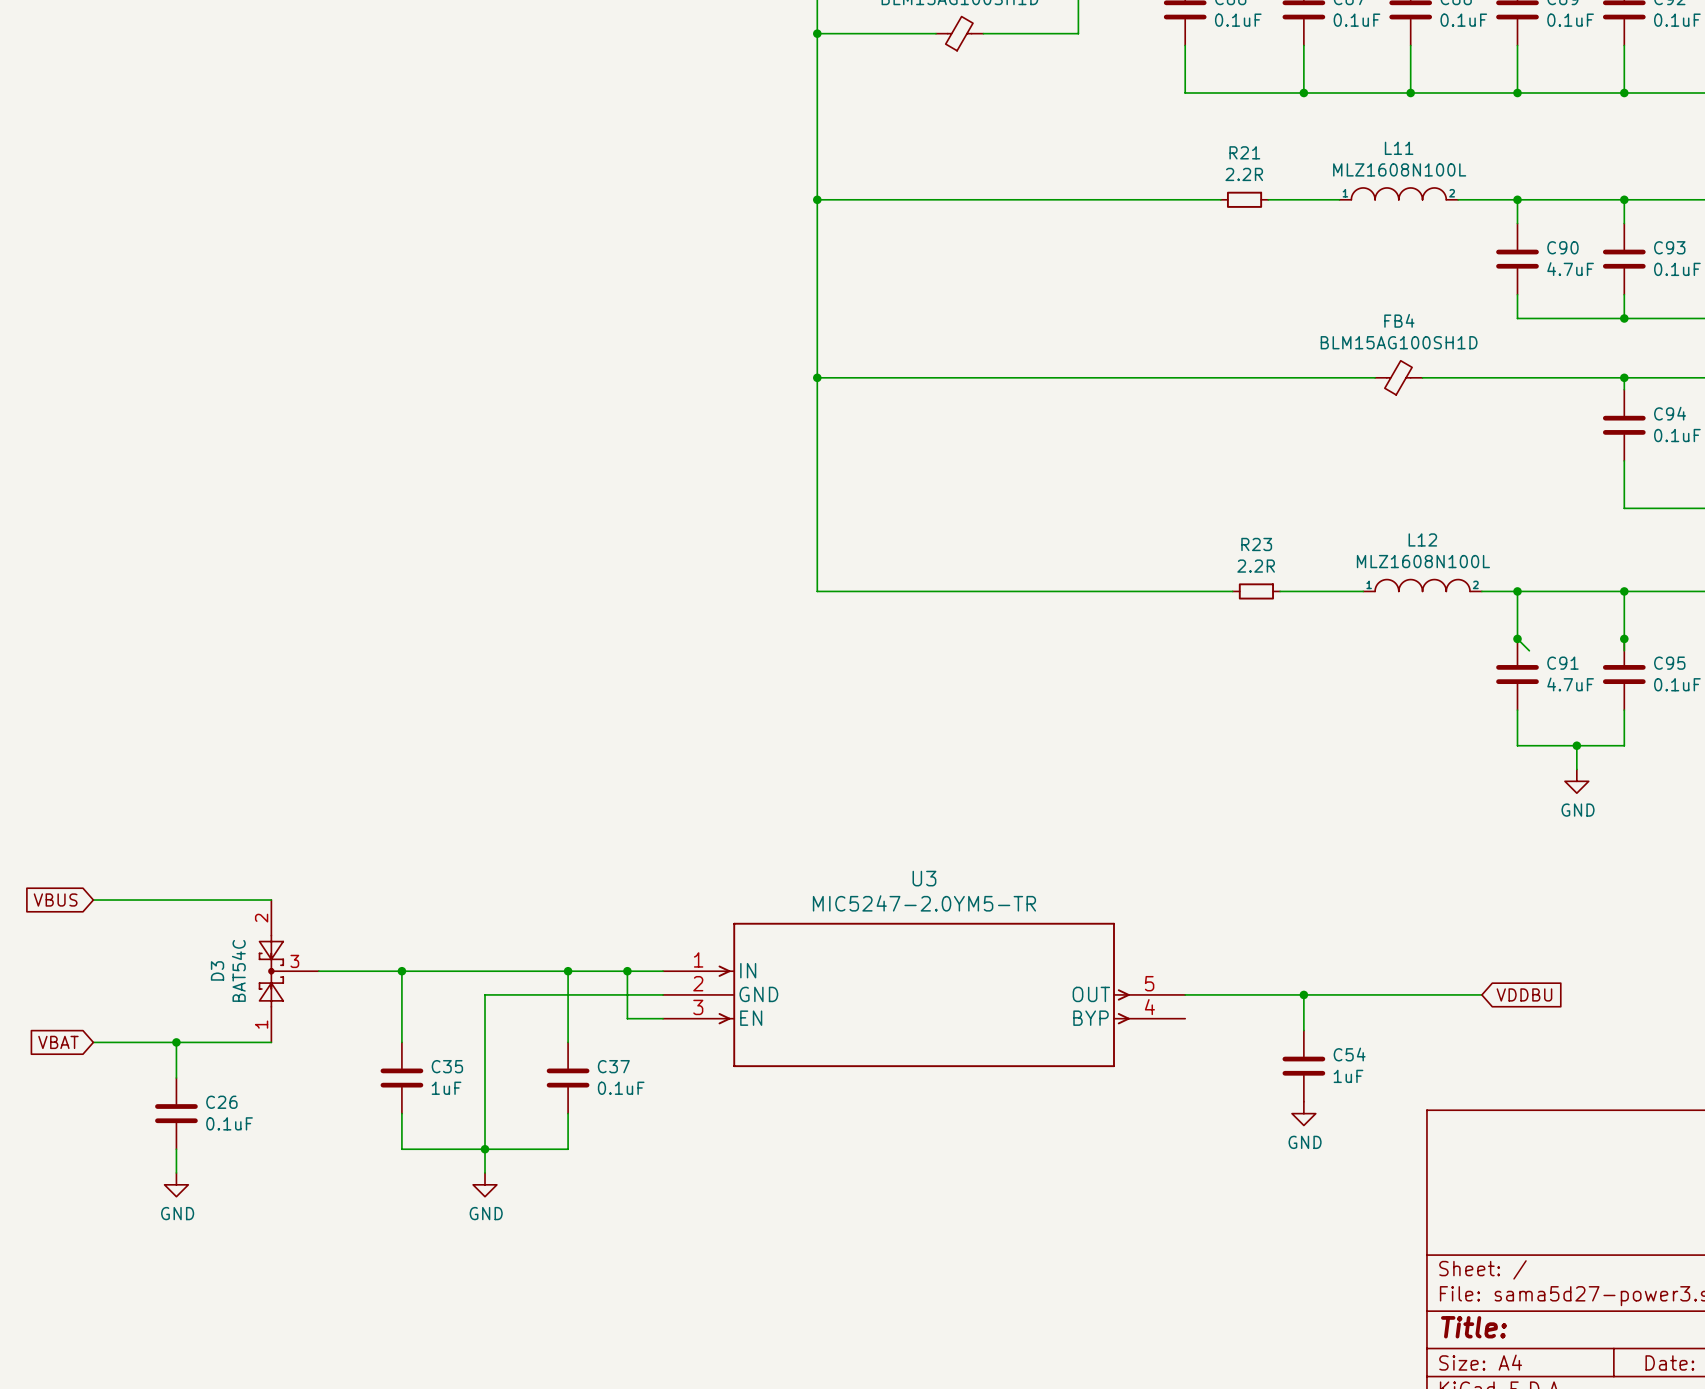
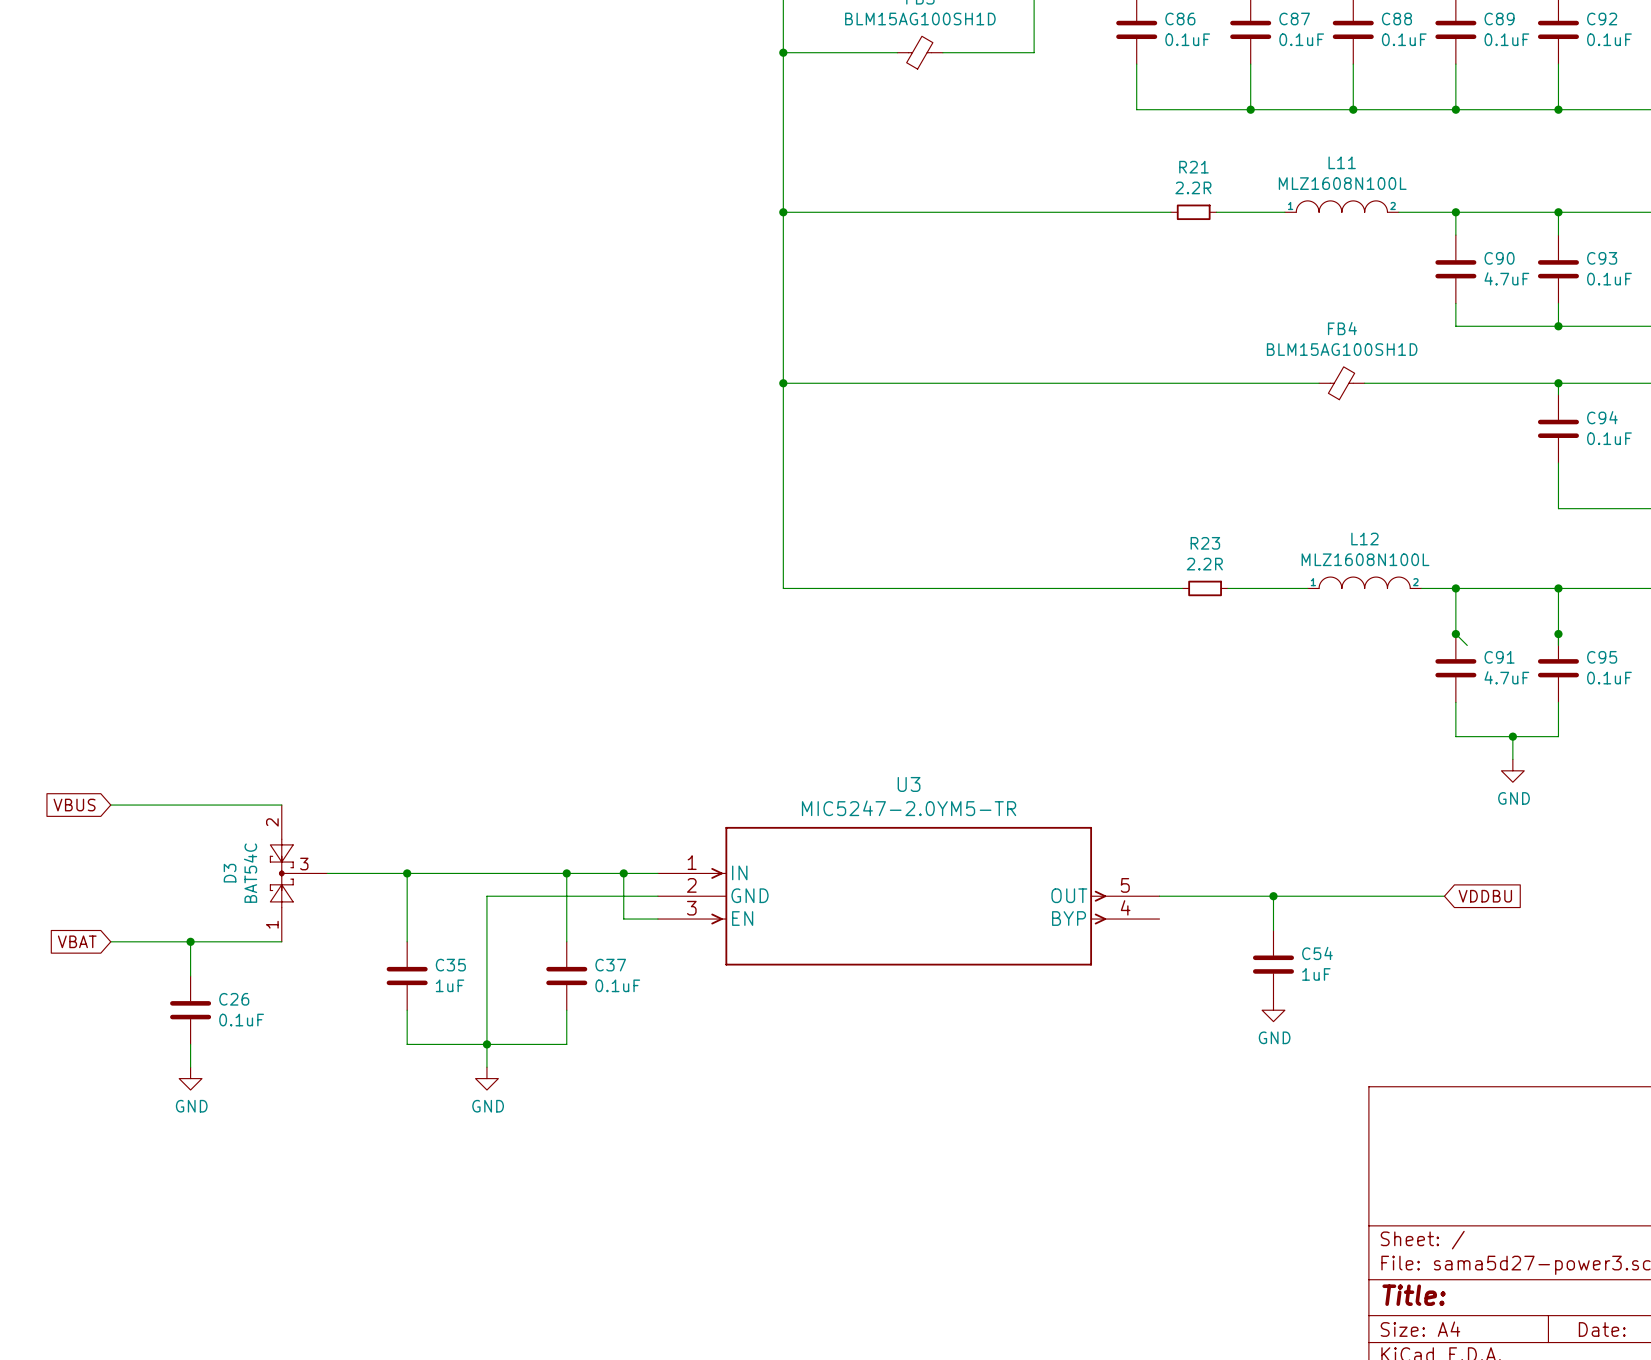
junction: none -> (407, 873)
junction: none -> (566, 873)
junction: none -> (623, 873)
global label position: VBUS (55, 900) -> VBUS (74, 805)
wire: (93, 900) (271, 900) -> (110, 805) (281, 805)
junction: none -> (1273, 896)
junction: none -> (190, 941)
D3 position: (289, 971) -> (298, 873)
wire: (318, 971) (663, 971) -> (327, 873) (657, 873)
wire: (401, 971) (401, 1042) -> (407, 873) (407, 941)
junction: (401, 971) -> none
wire: (568, 971) (568, 1042) -> (566, 873) (566, 941)
junction: (568, 971) -> none
wire: (627, 971) (627, 1018) (663, 1018) -> (623, 873) (623, 919) (657, 919)
junction: (627, 971) -> none
wire: (663, 994) (485, 994) (485, 1172) -> (657, 896) (486, 896) (486, 1067)
U3 position: (924, 994) -> (908, 896)
wire: (1185, 994) (1481, 994) -> (1159, 896) (1444, 896)
wire: (1303, 994) (1303, 1030) -> (1273, 896) (1273, 930)
junction: (1303, 994) -> none
global label position: VDDBU (1524, 994) -> VDDBU (1485, 896)
global label position: VBAT (58, 1042) -> VBAT (77, 941)
wire: (93, 1042) (271, 1042) -> (110, 941) (281, 941)
wire: (176, 1042) (176, 1078) -> (190, 941) (190, 976)
junction: (176, 1042) -> none
junction: none -> (486, 1044)
C54 position: (1303, 1066) -> (1273, 964)
C35 position: (401, 1078) -> (407, 976)
C37 position: (568, 1078) -> (566, 976)
C26 position: (176, 1113) -> (190, 1010)
wire: (401, 1113) (401, 1149) (568, 1149) (568, 1113) -> (407, 1010) (407, 1044) (566, 1044) (566, 1010)
power symbol position: GND (1303, 1113) -> GND (1273, 1010)
wire: (176, 1149) (176, 1172) -> (190, 1044) (190, 1067)
junction: (485, 1149) -> none
power symbol position: GND (176, 1184) -> GND (190, 1078)
power symbol position: GND (485, 1184) -> GND (486, 1078)

